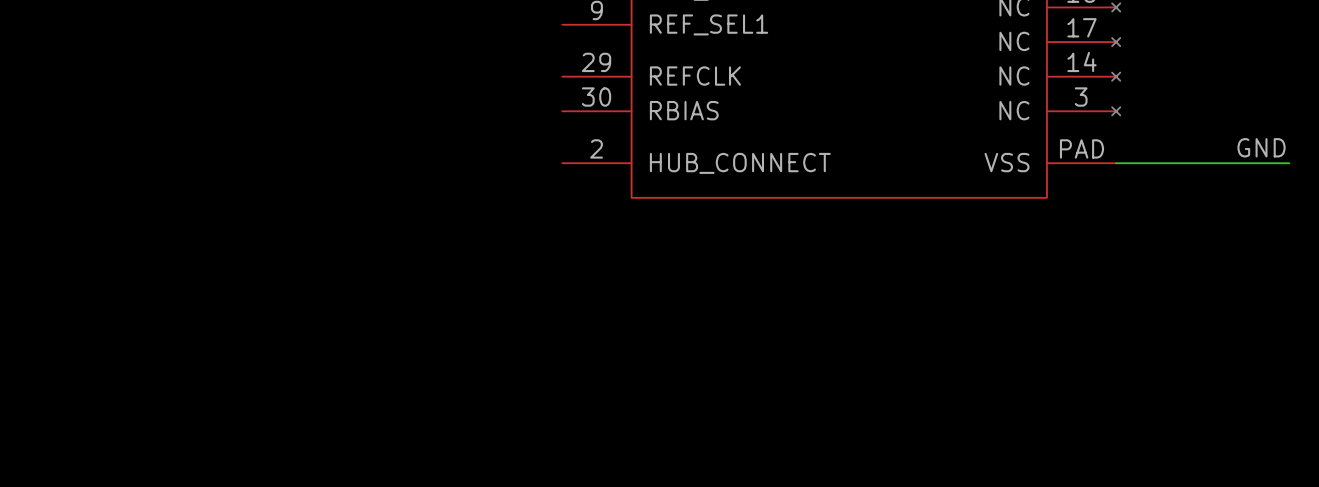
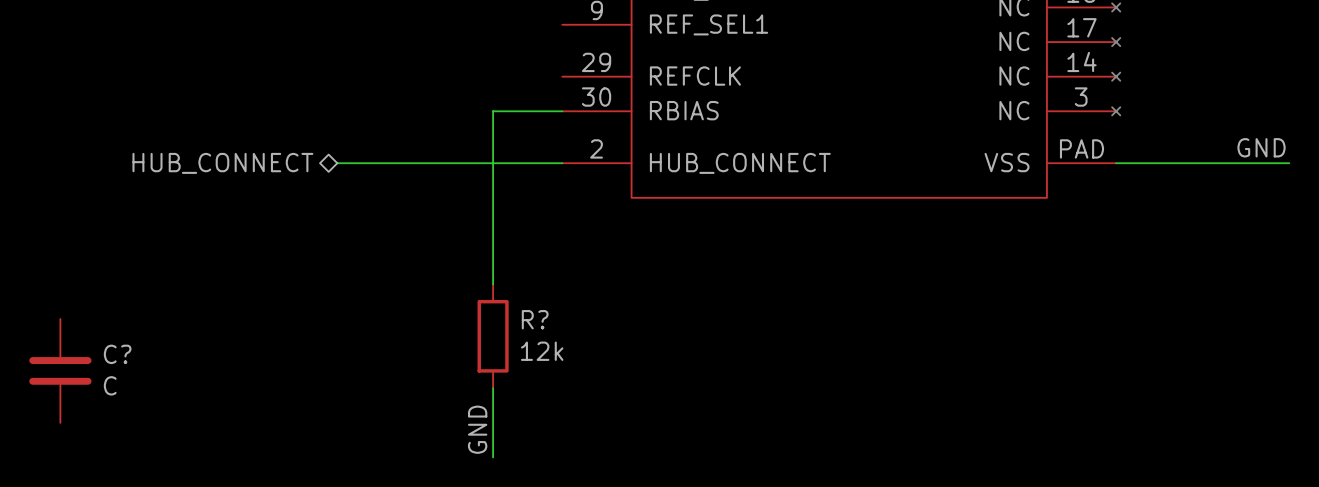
wire: none -> (562, 111) (493, 111) (493, 284)
hierarchical label: none -> HUB_CONNECT (222, 163)
wire: none -> (337, 163) (562, 163)
R?: none -> 12k (493, 336)
C?: none -> C (60, 370)
wire: none -> (493, 388) (493, 457)
label: none -> GND (477, 429)

